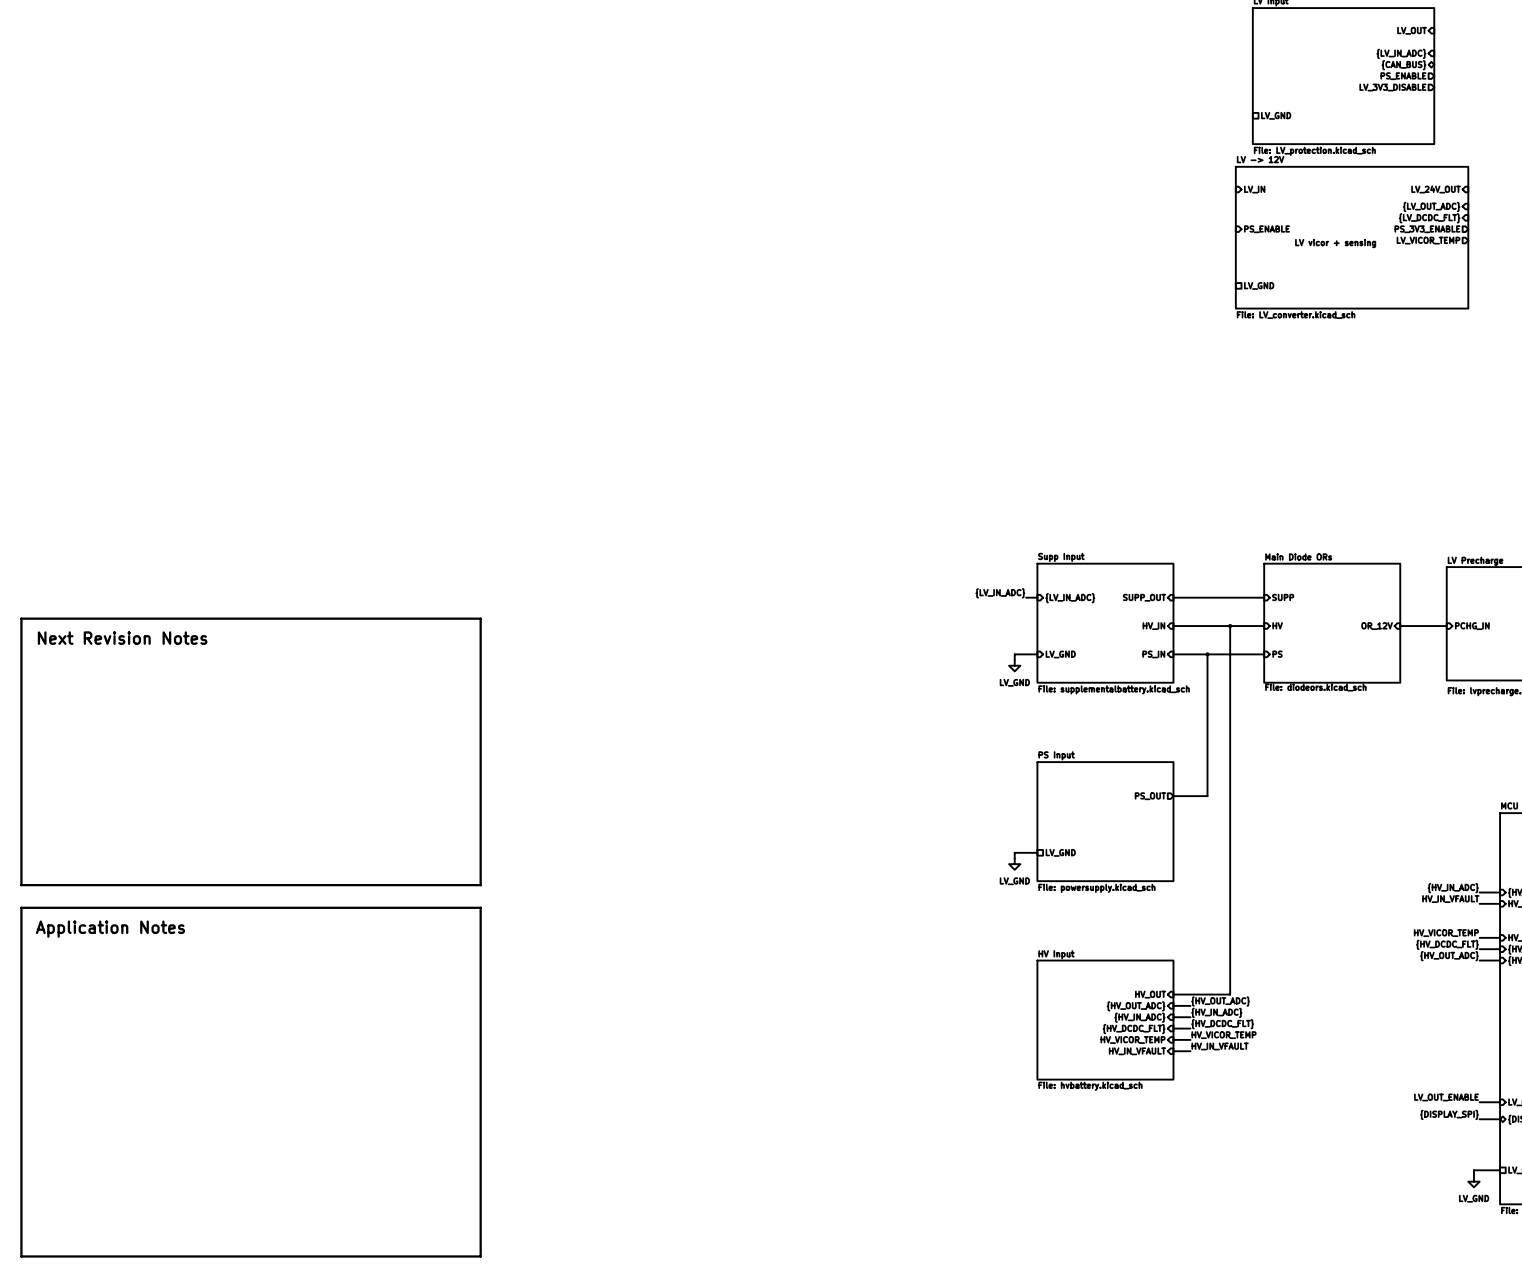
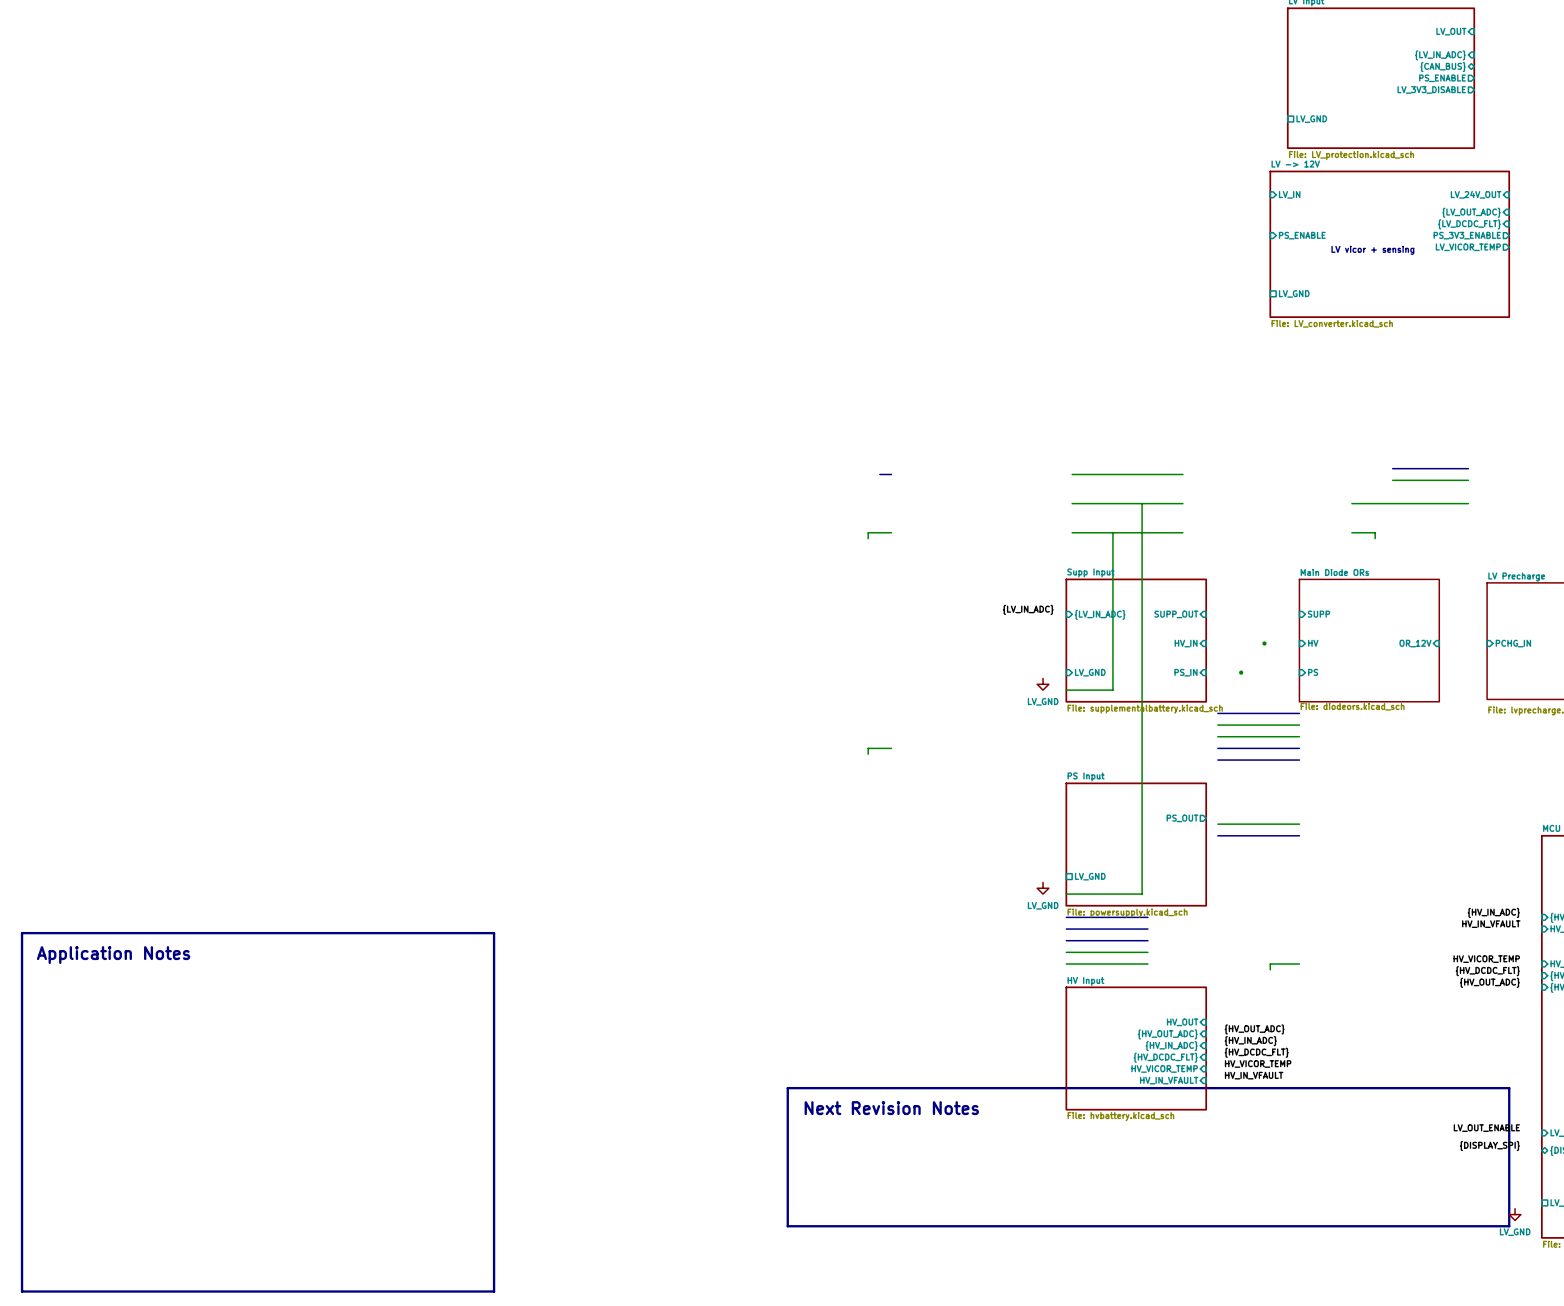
bus: none -> (1392, 468) (1468, 468)
bus: none -> (879, 474) (891, 474)
wire: none -> (1072, 474) (1182, 474)
wire: none -> (1392, 480) (1468, 480)
wire: none -> (1072, 503) (1182, 503)
wire: none -> (1142, 503) (1142, 894) (1066, 894)
wire: none -> (1351, 503) (1468, 503)
wire: none -> (891, 532) (868, 532) (868, 538)
wire: none -> (1072, 532) (1182, 532)
wire: none -> (1112, 532) (1112, 690) (1066, 690)
wire: none -> (1351, 532) (1375, 532) (1375, 538)
bus: (1026, 597) (1037, 597) -> none
wire: (1173, 597) (1264, 597) -> none
line: (21, 618) (480, 618) (480, 885) (21, 885) (21, 618) -> none
wire: (1173, 626) (1264, 626) -> none
wire: (1230, 626) (1230, 994) (1173, 994) -> none
wire: (1400, 626) (1445, 626) -> none
text: Next Revision Notes (122, 638) -> none
wire: (1037, 654) (1014, 654) (1014, 660) -> none
wire: (1173, 654) (1264, 654) -> none
wire: (1207, 654) (1207, 796) (1173, 796) -> none
bus: none -> (1217, 713) (1299, 713)
wire: none -> (1217, 725) (1299, 725)
wire: none -> (1217, 736) (1299, 736)
wire: none -> (891, 748) (868, 748) (868, 754)
bus: none -> (1217, 748) (1299, 748)
bus: none -> (1217, 760) (1299, 760)
wire: none -> (1217, 824) (1299, 824)
bus: none -> (1217, 835) (1299, 835)
wire: (1037, 852) (1014, 852) (1014, 858) -> none
bus: none -> (1066, 917) (1147, 917)
bus: (1479, 892) (1500, 892) -> none
bus: none -> (1066, 929) (1147, 929)
wire: (1479, 903) (1500, 903) -> none
bus: none -> (1066, 940) (1147, 940)
wire: none -> (1066, 952) (1147, 952)
wire: none -> (1066, 964) (1147, 964)
wire: none -> (1299, 964) (1270, 964) (1270, 969)
wire: (1479, 937) (1500, 937) -> none
bus: (1479, 949) (1500, 949) -> none
bus: (1479, 960) (1500, 960) -> none
bus: (1173, 1005) (1190, 1005) -> none
bus: (1173, 1017) (1190, 1017) -> none
bus: (1173, 1028) (1190, 1028) -> none
wire: (1173, 1039) (1190, 1039) -> none
wire: (1173, 1051) (1190, 1051) -> none
line: none -> (787, 1088) (1509, 1088) (1509, 1226) (787, 1226) (787, 1088)
text: none -> Next Revision Notes (891, 1108)
wire: (1479, 1102) (1500, 1102) -> none
bus: (1479, 1119) (1500, 1119) -> none
wire: (1500, 1170) (1473, 1170) (1473, 1175) -> none

